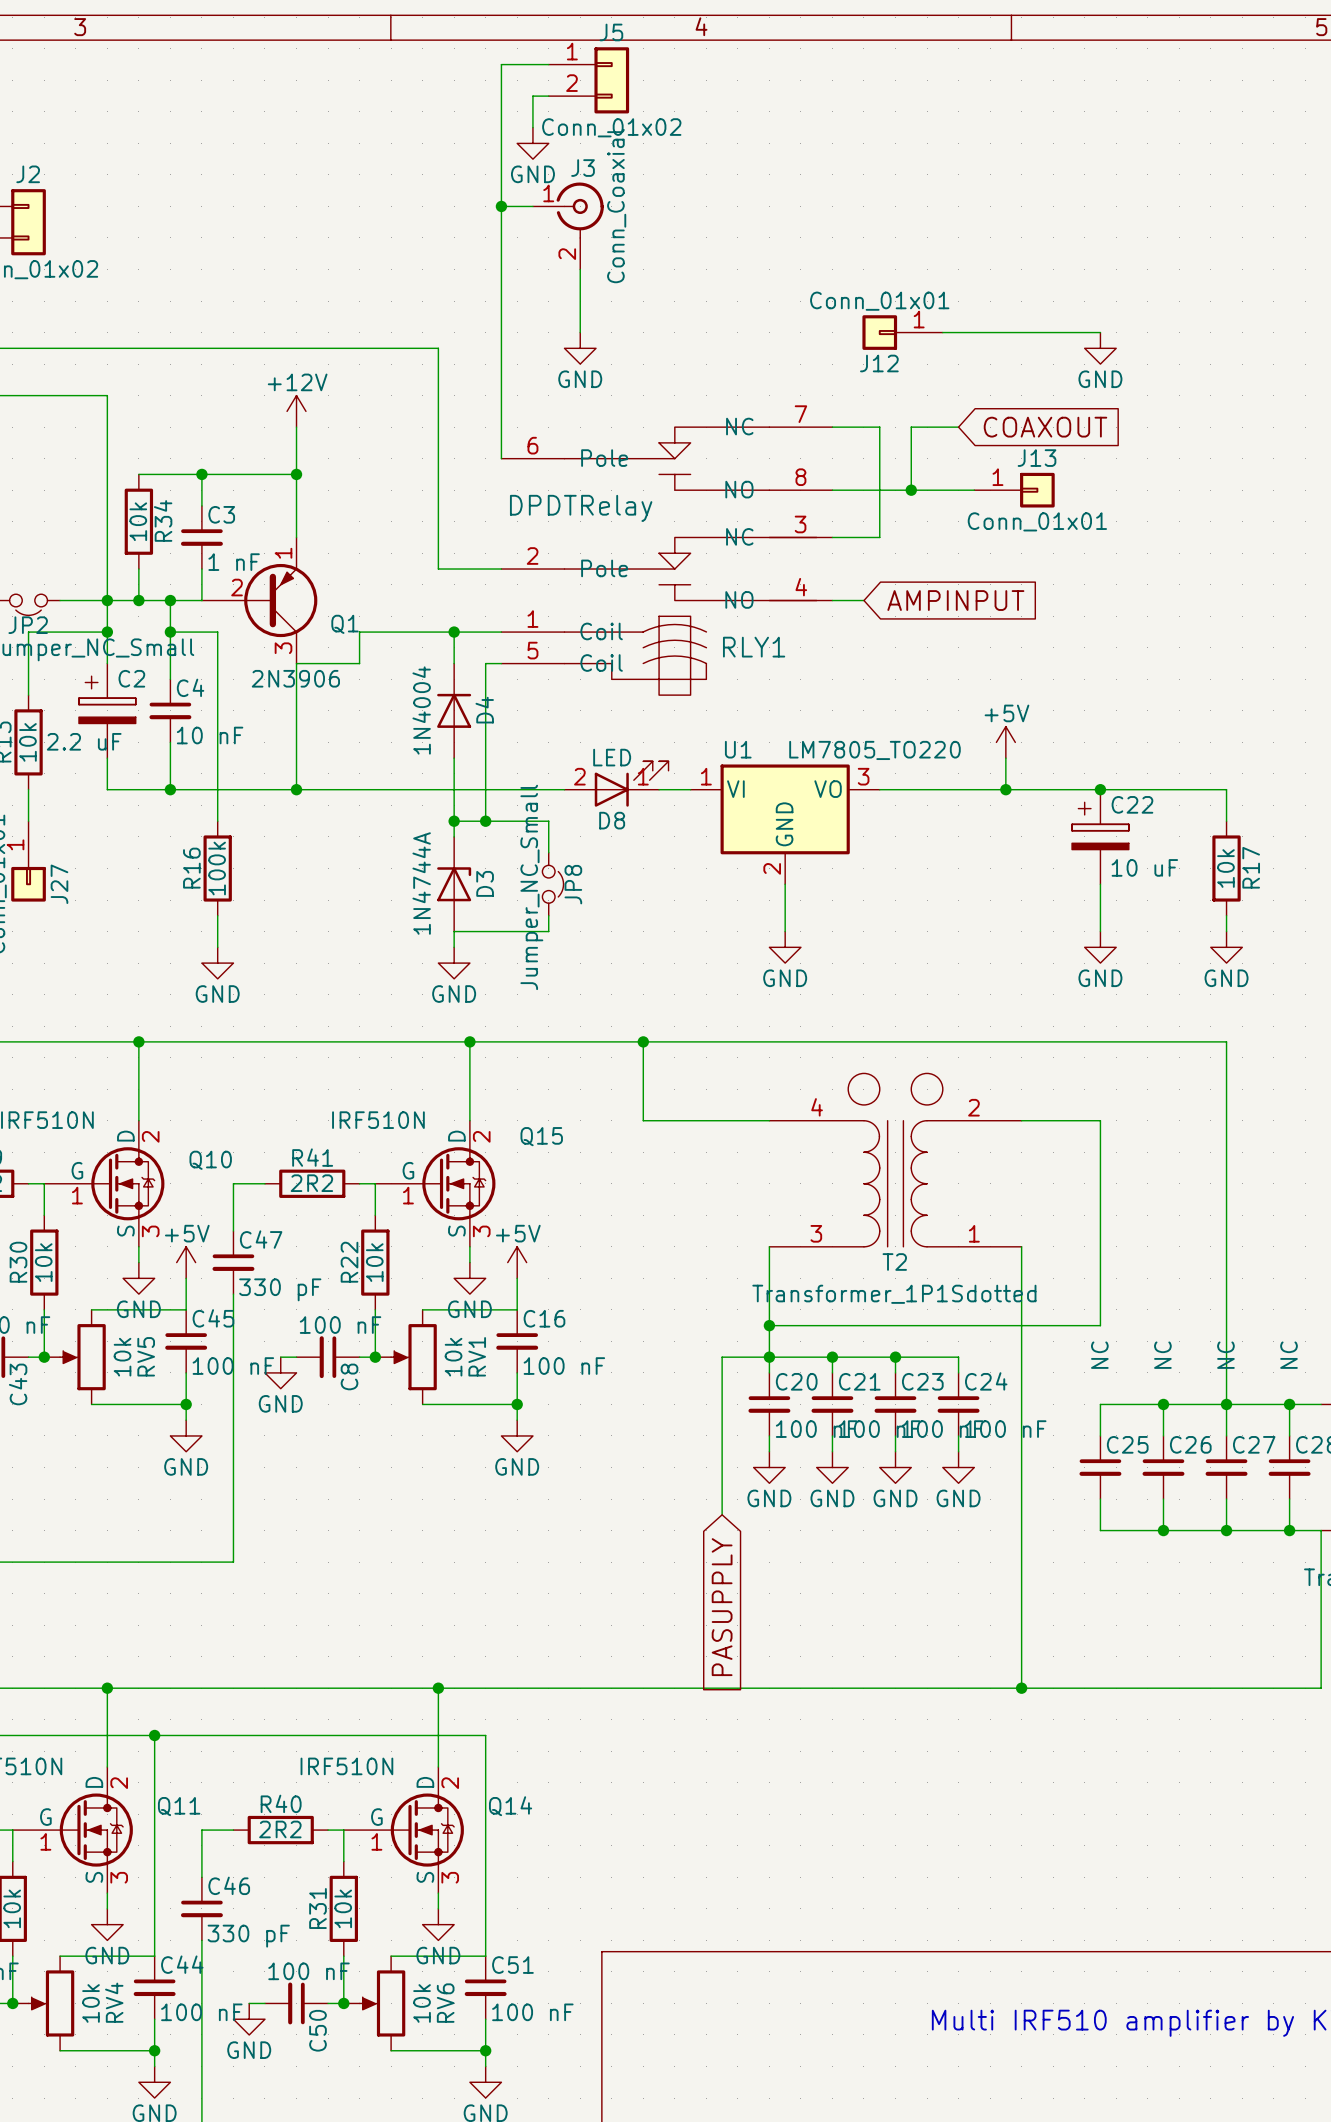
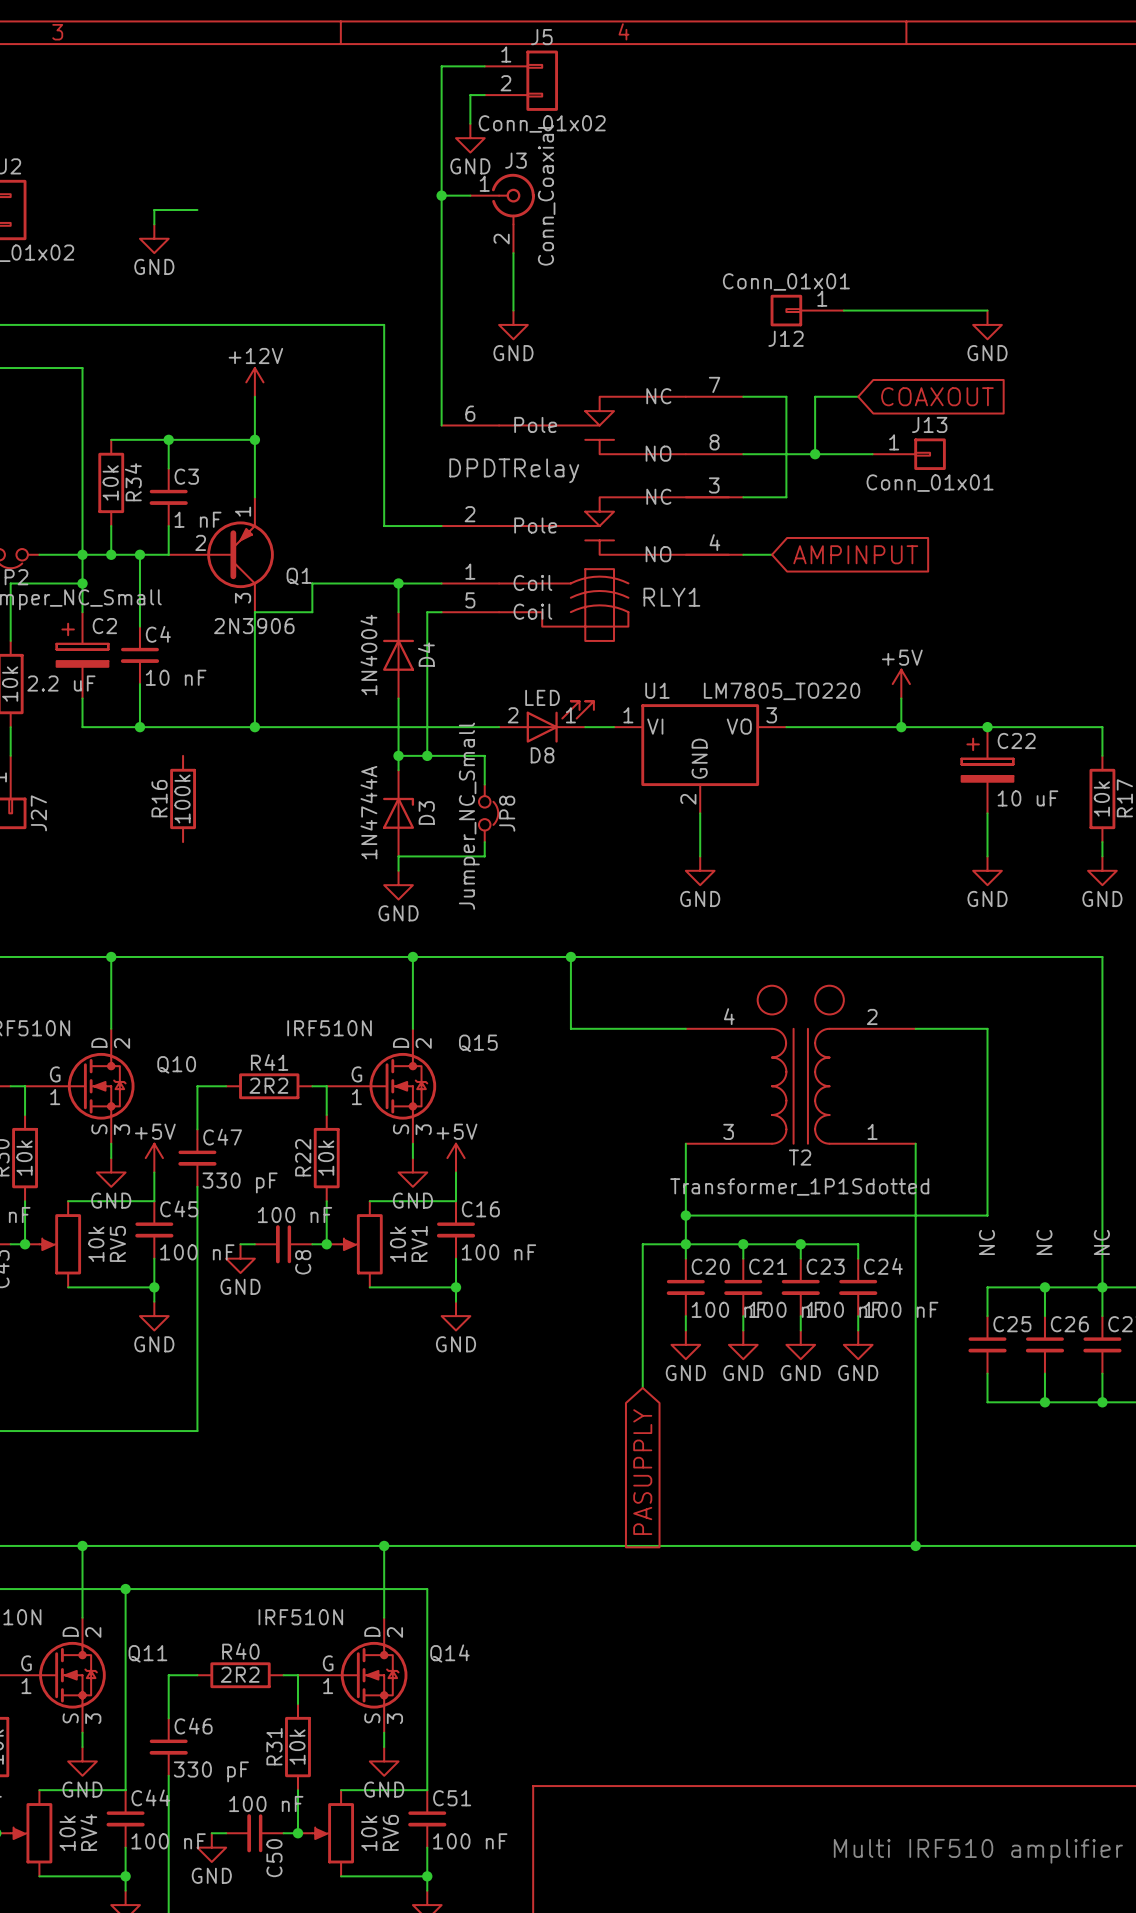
wire: none -> (197, 210) (154, 210) (154, 224)
power symbol: none -> GND (154, 238)
wire: (170, 632) (217, 632) (217, 821) -> none
junction: (170, 632) -> none
wire: (217, 915) (217, 947) -> none
power symbol: GND (217, 963) -> none

